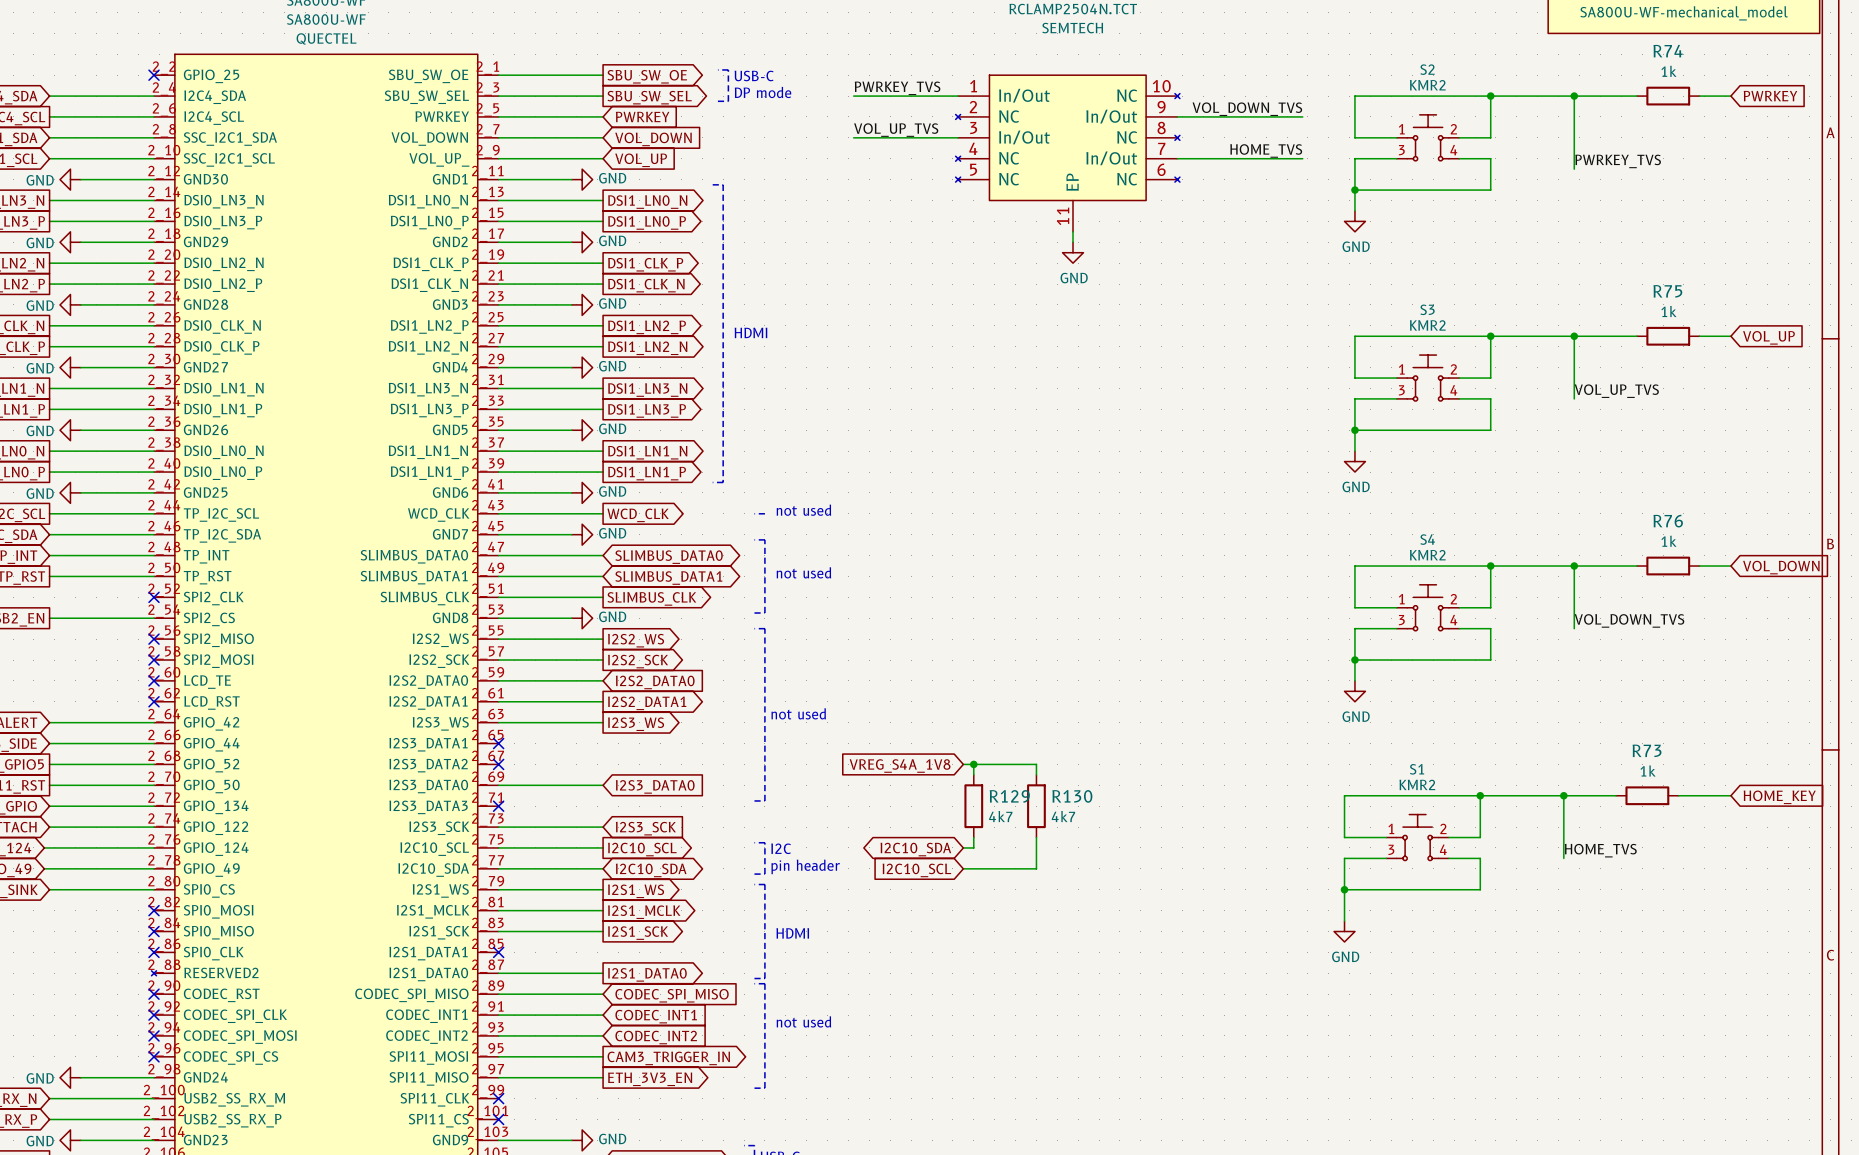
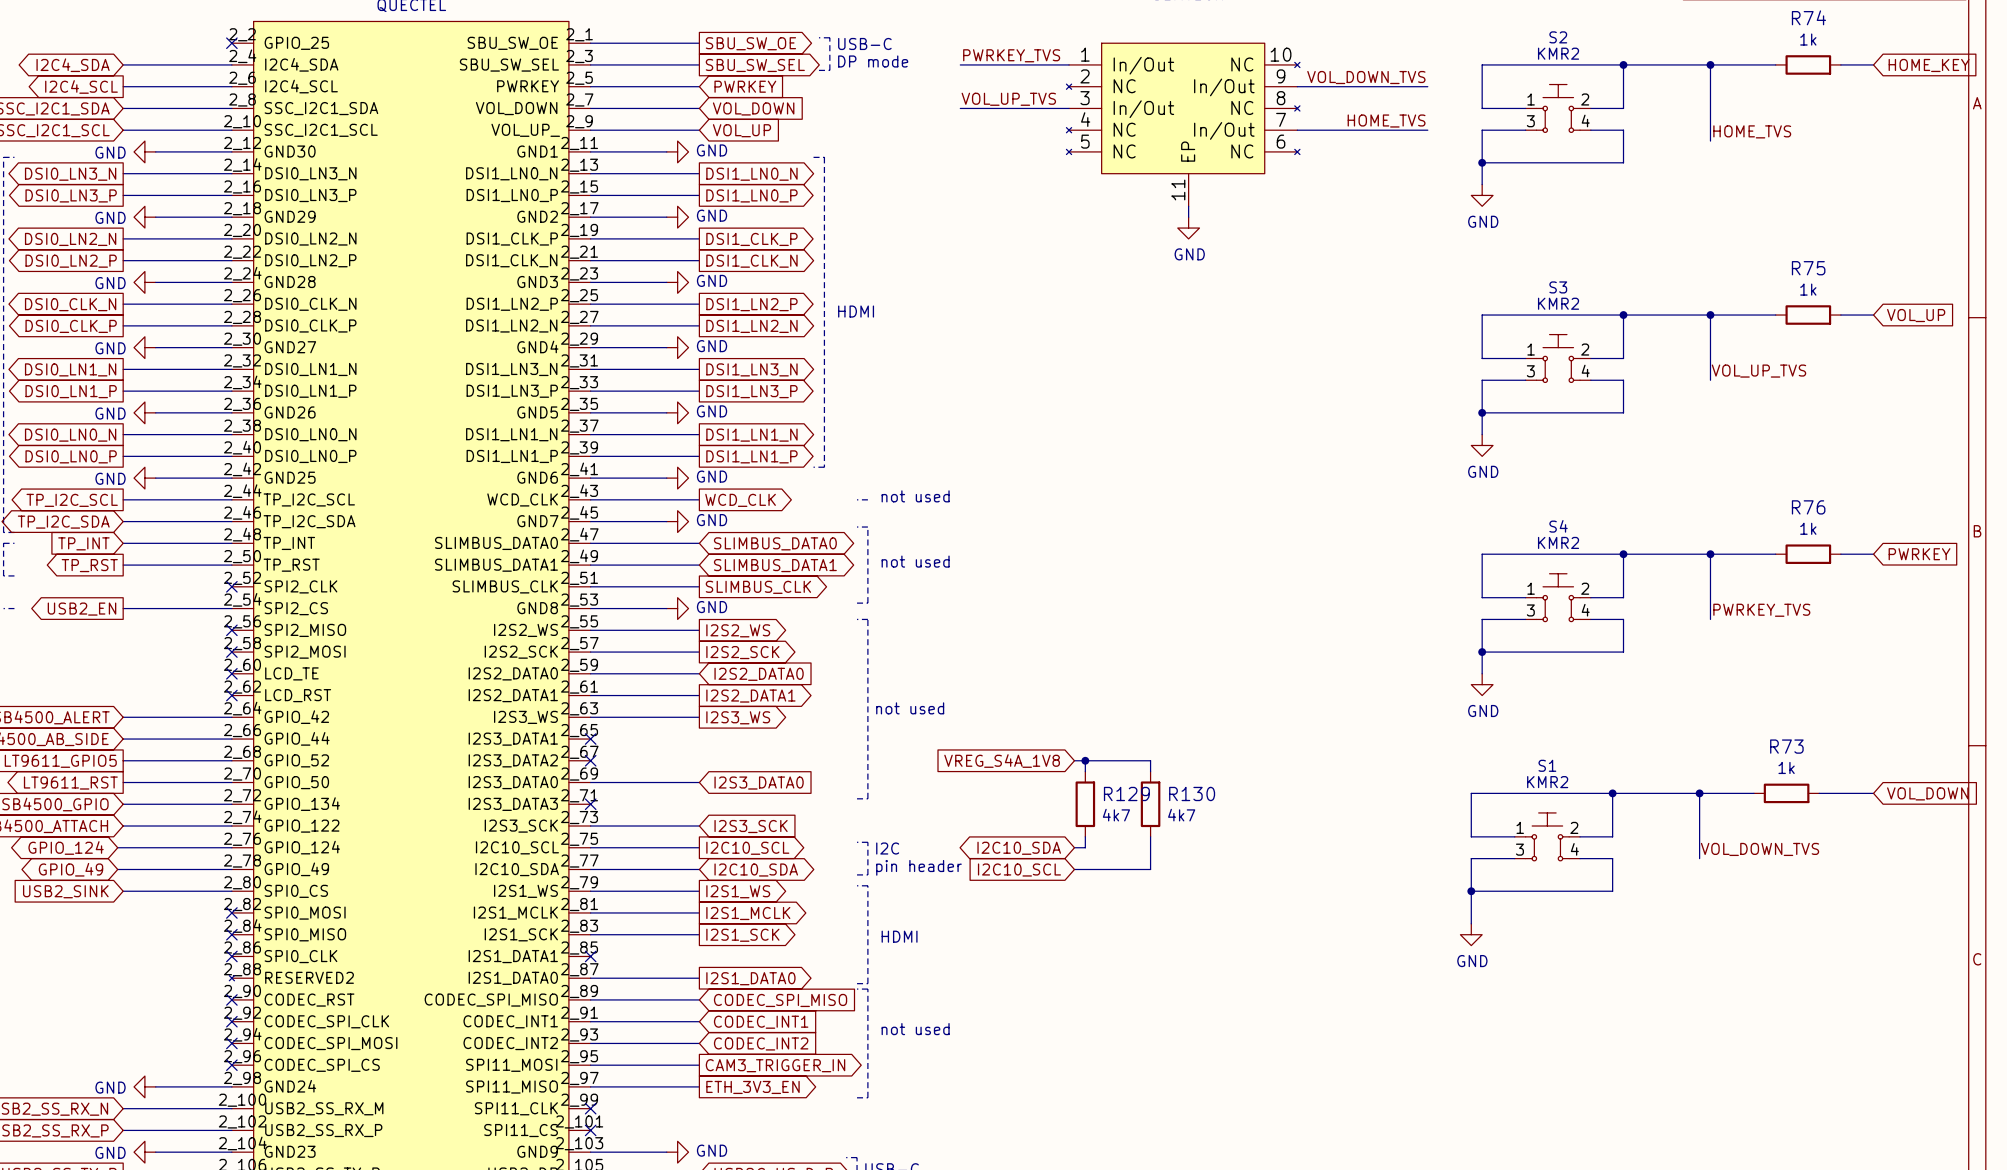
global label: PWRKEY (1770, 96) -> HOME_KEY (1929, 65)
label: PWRKEY_TVS (1618, 161) -> HOME_TVS (1752, 131)
global label: VOL_DOWN (1781, 567) -> PWRKEY (1919, 554)
label: VOL_DOWN_TVS (1629, 620) -> PWRKEY_TVS (1761, 610)
global label: HOME_KEY (1779, 797) -> VOL_DOWN (1927, 793)
label: HOME_TVS (1600, 850) -> VOL_DOWN_TVS (1760, 849)

